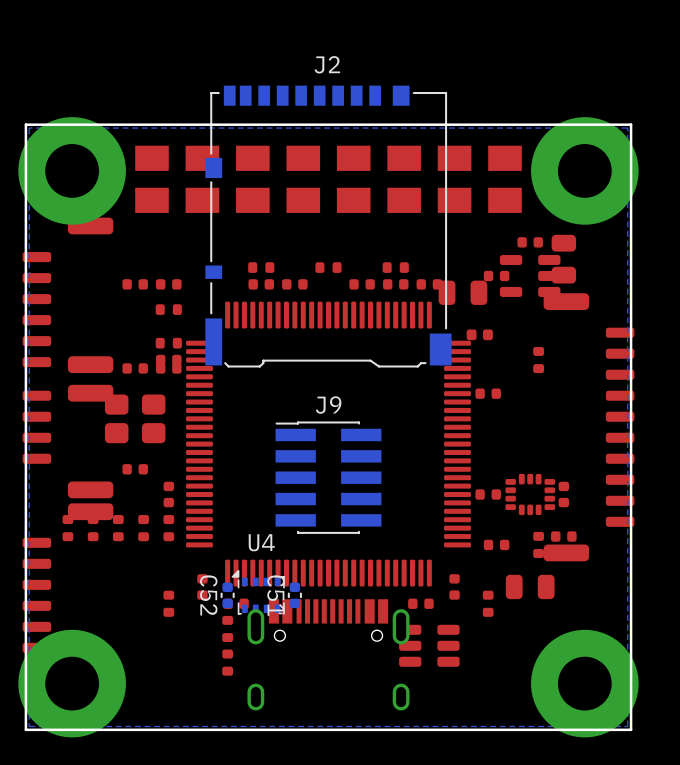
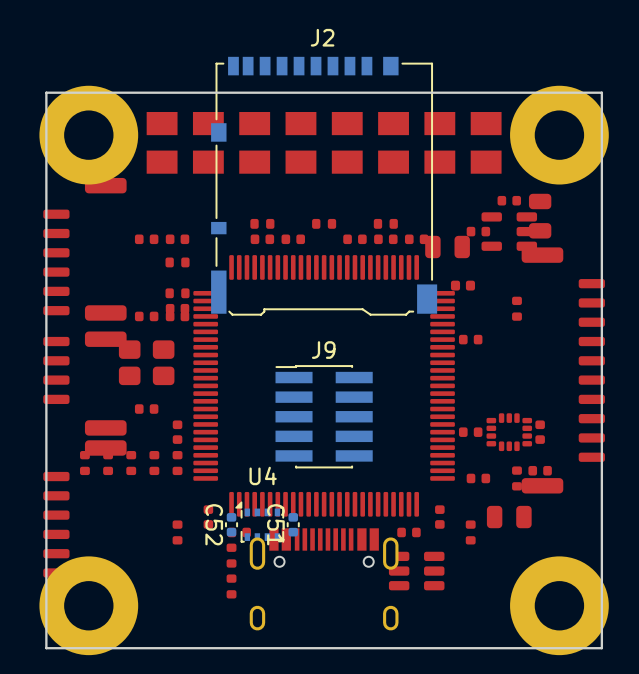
bottom zone outline: (627, 128) (29, 128) (29, 726) (627, 726) (627, 128) -> none

